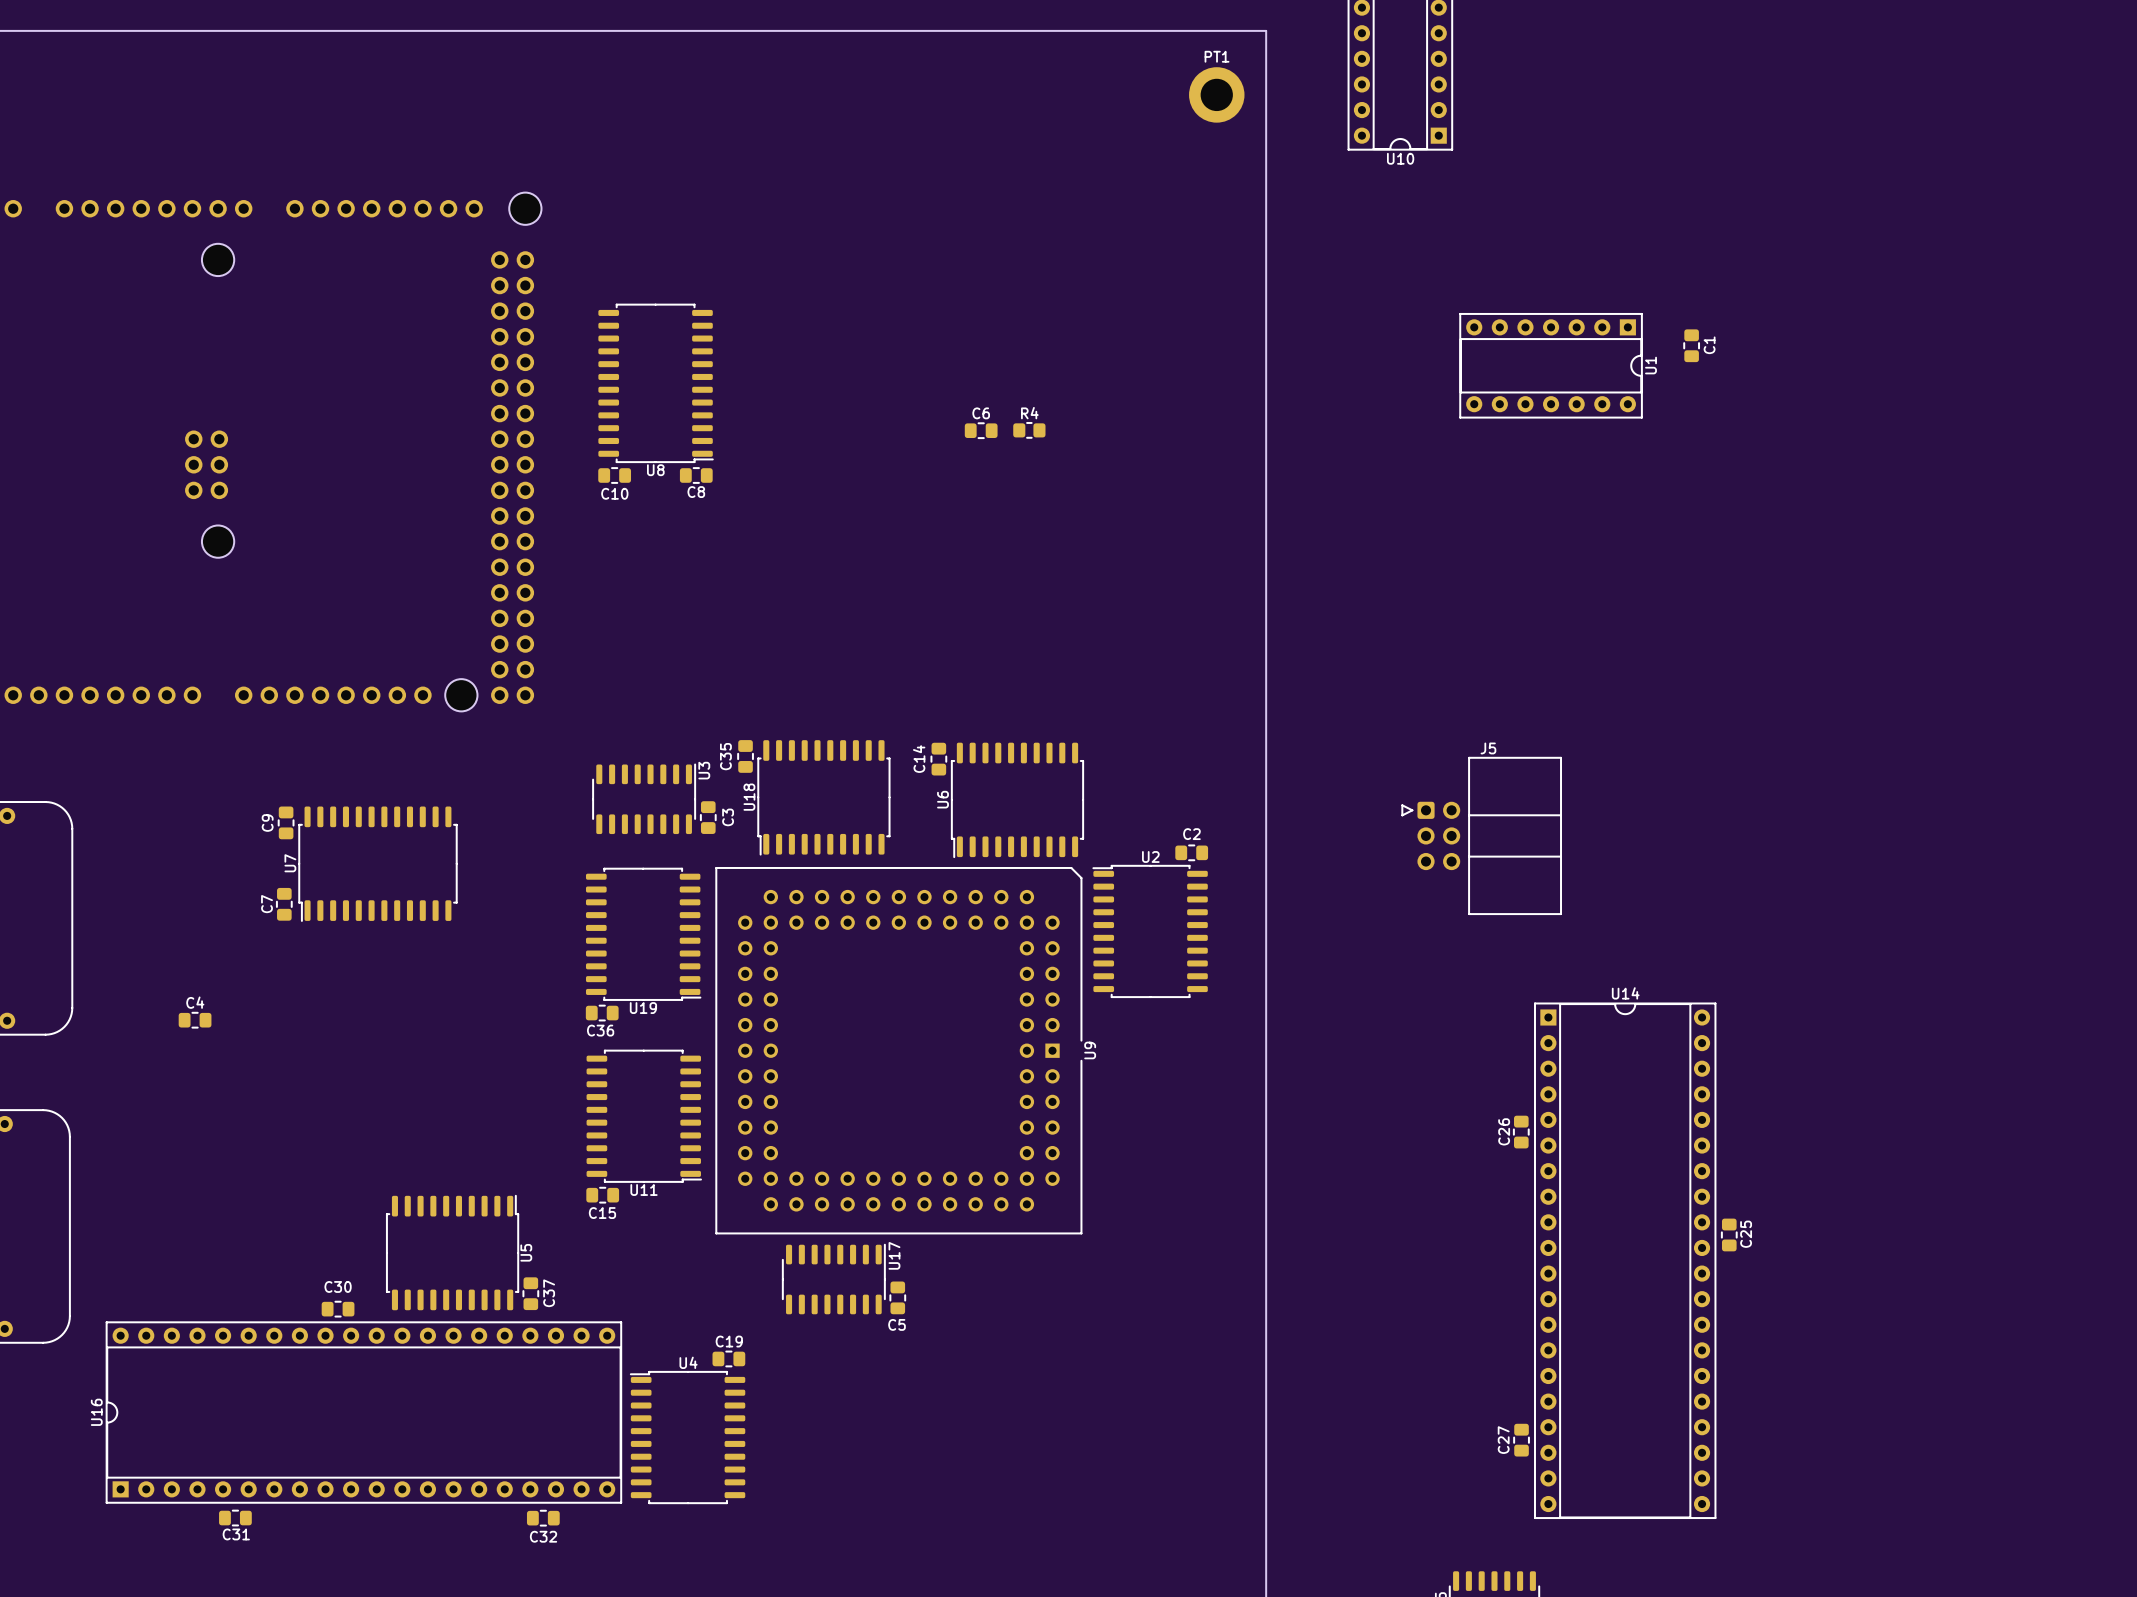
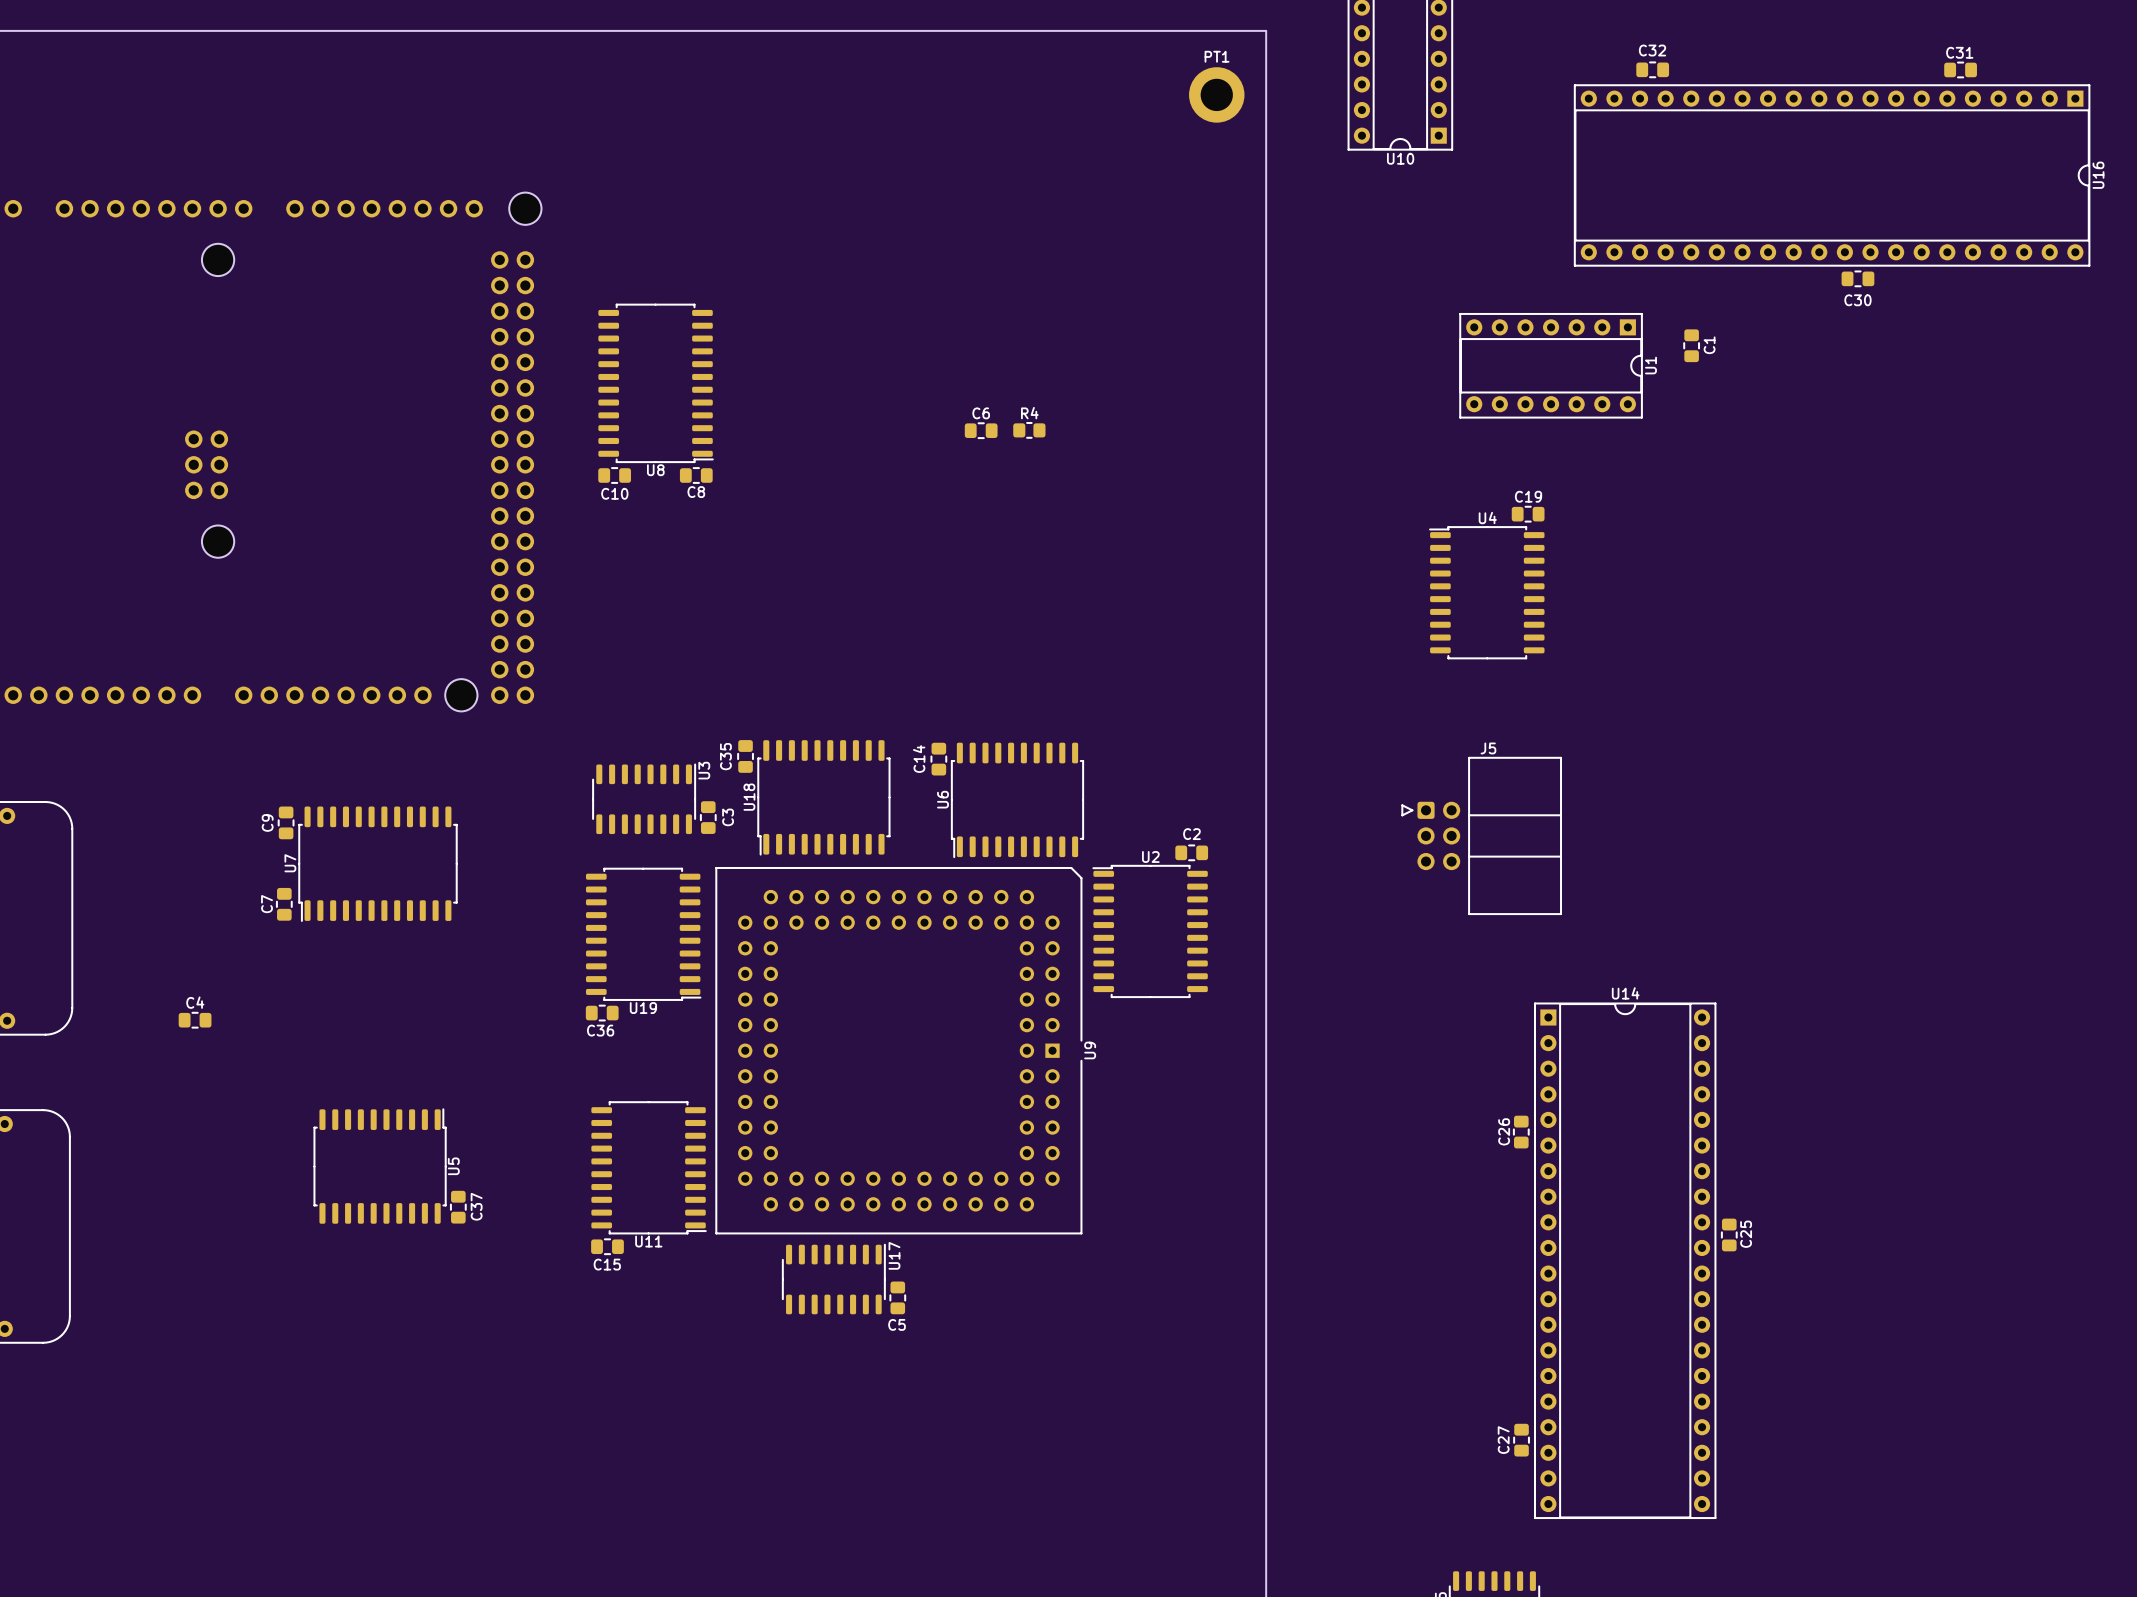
U11 position: (644, 1116) -> (648, 1167)
C15 position: (602, 1195) -> (607, 1246)
U5 position: (452, 1252) -> (380, 1166)
C30 name position: C30 (338, 1286) -> C30 (1857, 300)
C37 position: (530, 1293) -> (458, 1207)
C30 position: (338, 1309) -> (1857, 278)
C19 position: (728, 1358) -> (1528, 514)
U16 rotation: 0° (363, 1412) -> 180° (1832, 175)
U16 position: (363, 1412) -> (1832, 175)
U4 position: (687, 1437) -> (1486, 592)
C31 position: (235, 1518) -> (1960, 69)
C32 position: (543, 1518) -> (1652, 69)
C31 name position: C31 (236, 1534) -> C31 (1959, 52)
C32 name position: C32 (543, 1536) -> C32 (1652, 50)

